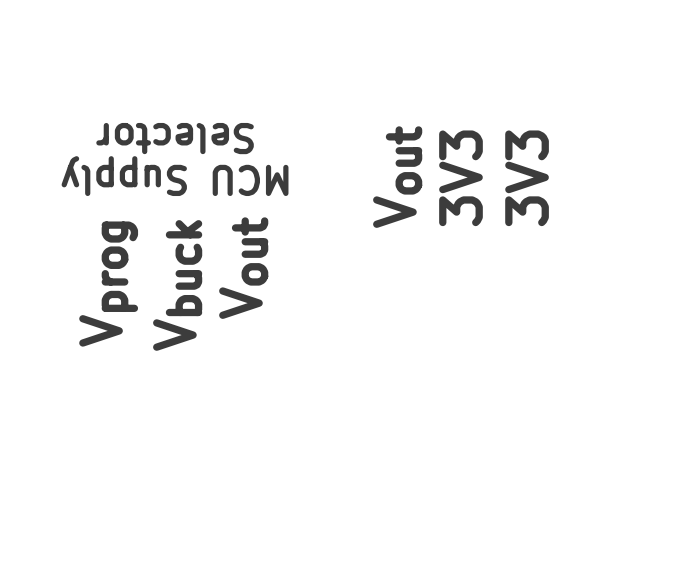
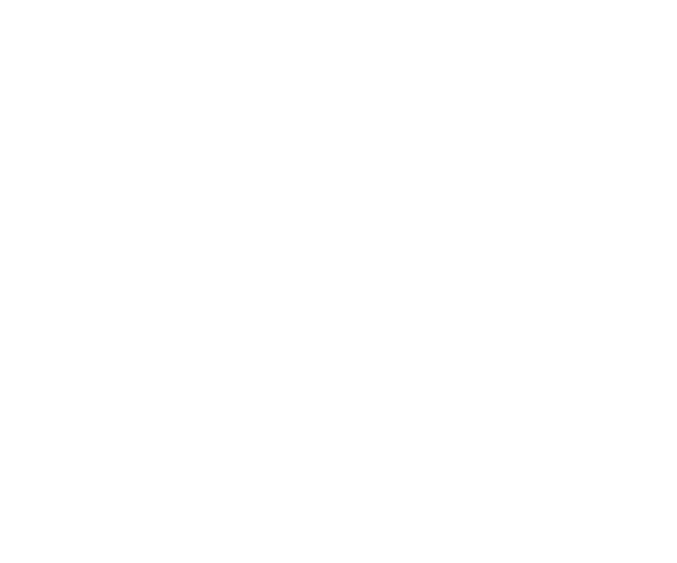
text: Selector (175, 138) -> none
text: MCU Supply (175, 176) -> none
text: Vout (397, 177) -> none
text: 3V3 (460, 178) -> none
text: 3V3 (527, 178) -> none
text: Vout (243, 268) -> none
text: Vprog (108, 284) -> none
text: Vbuck (177, 285) -> none

